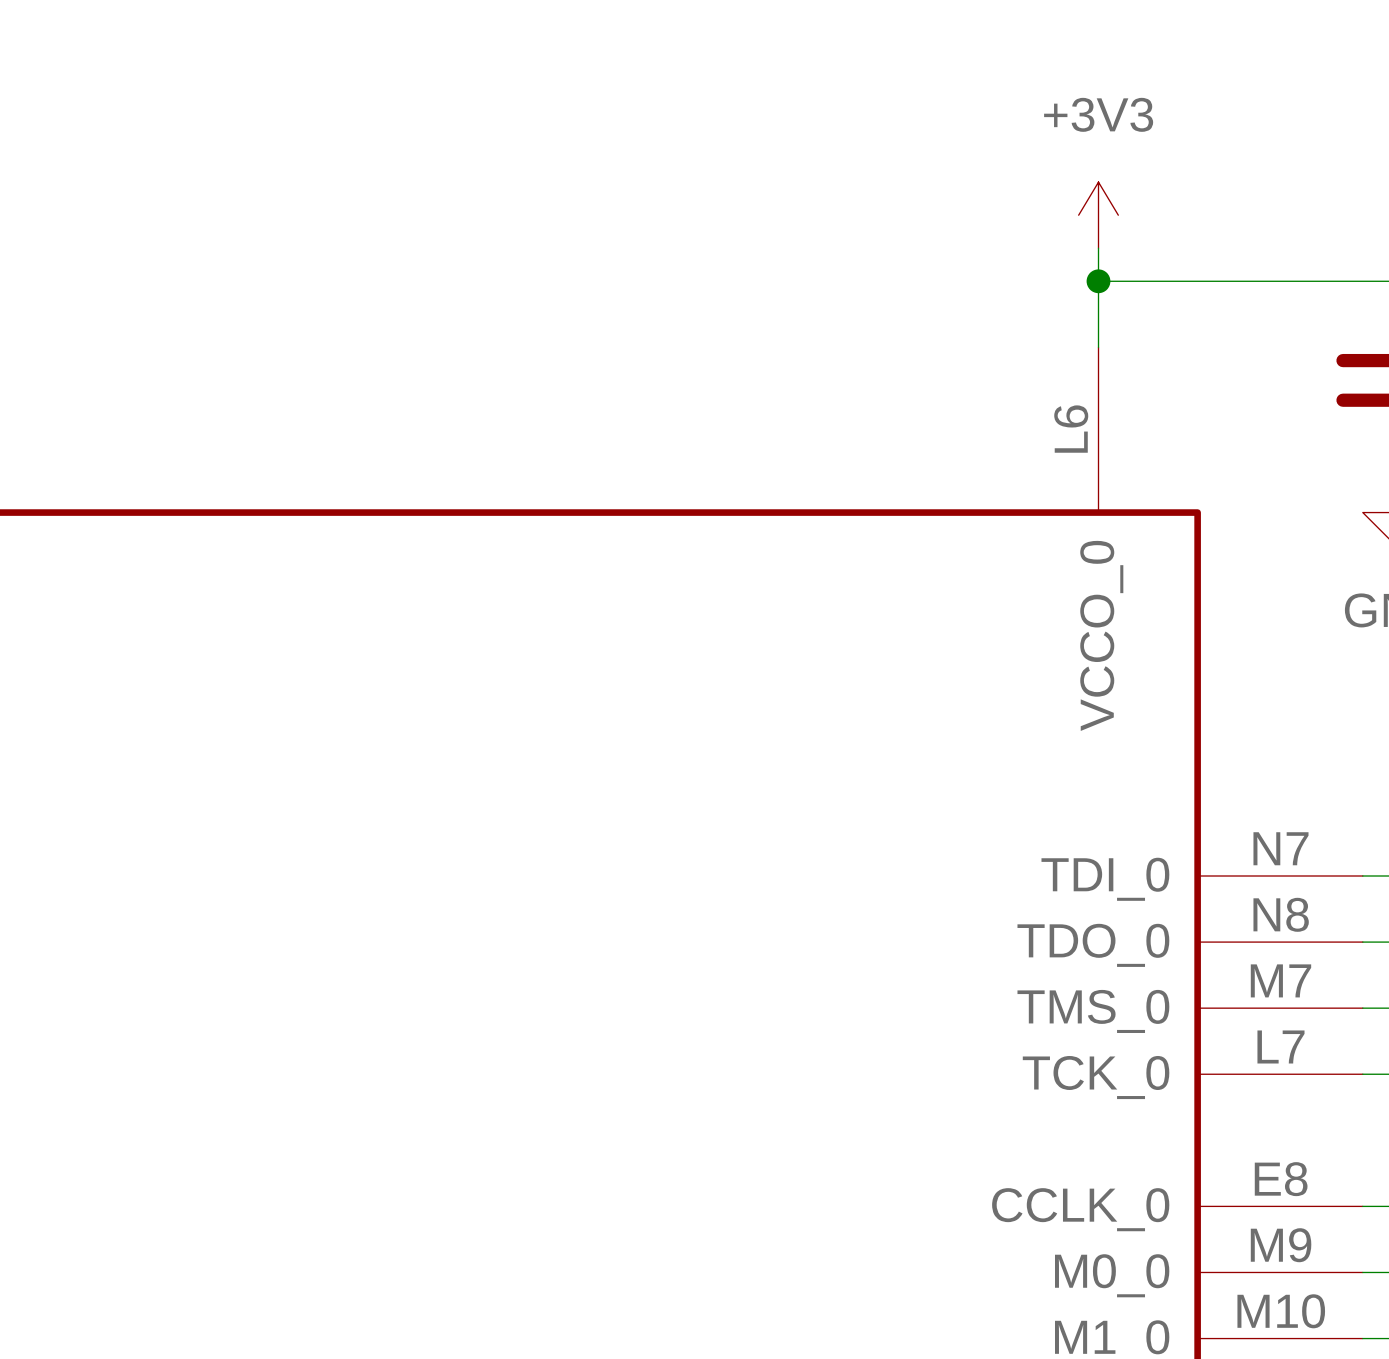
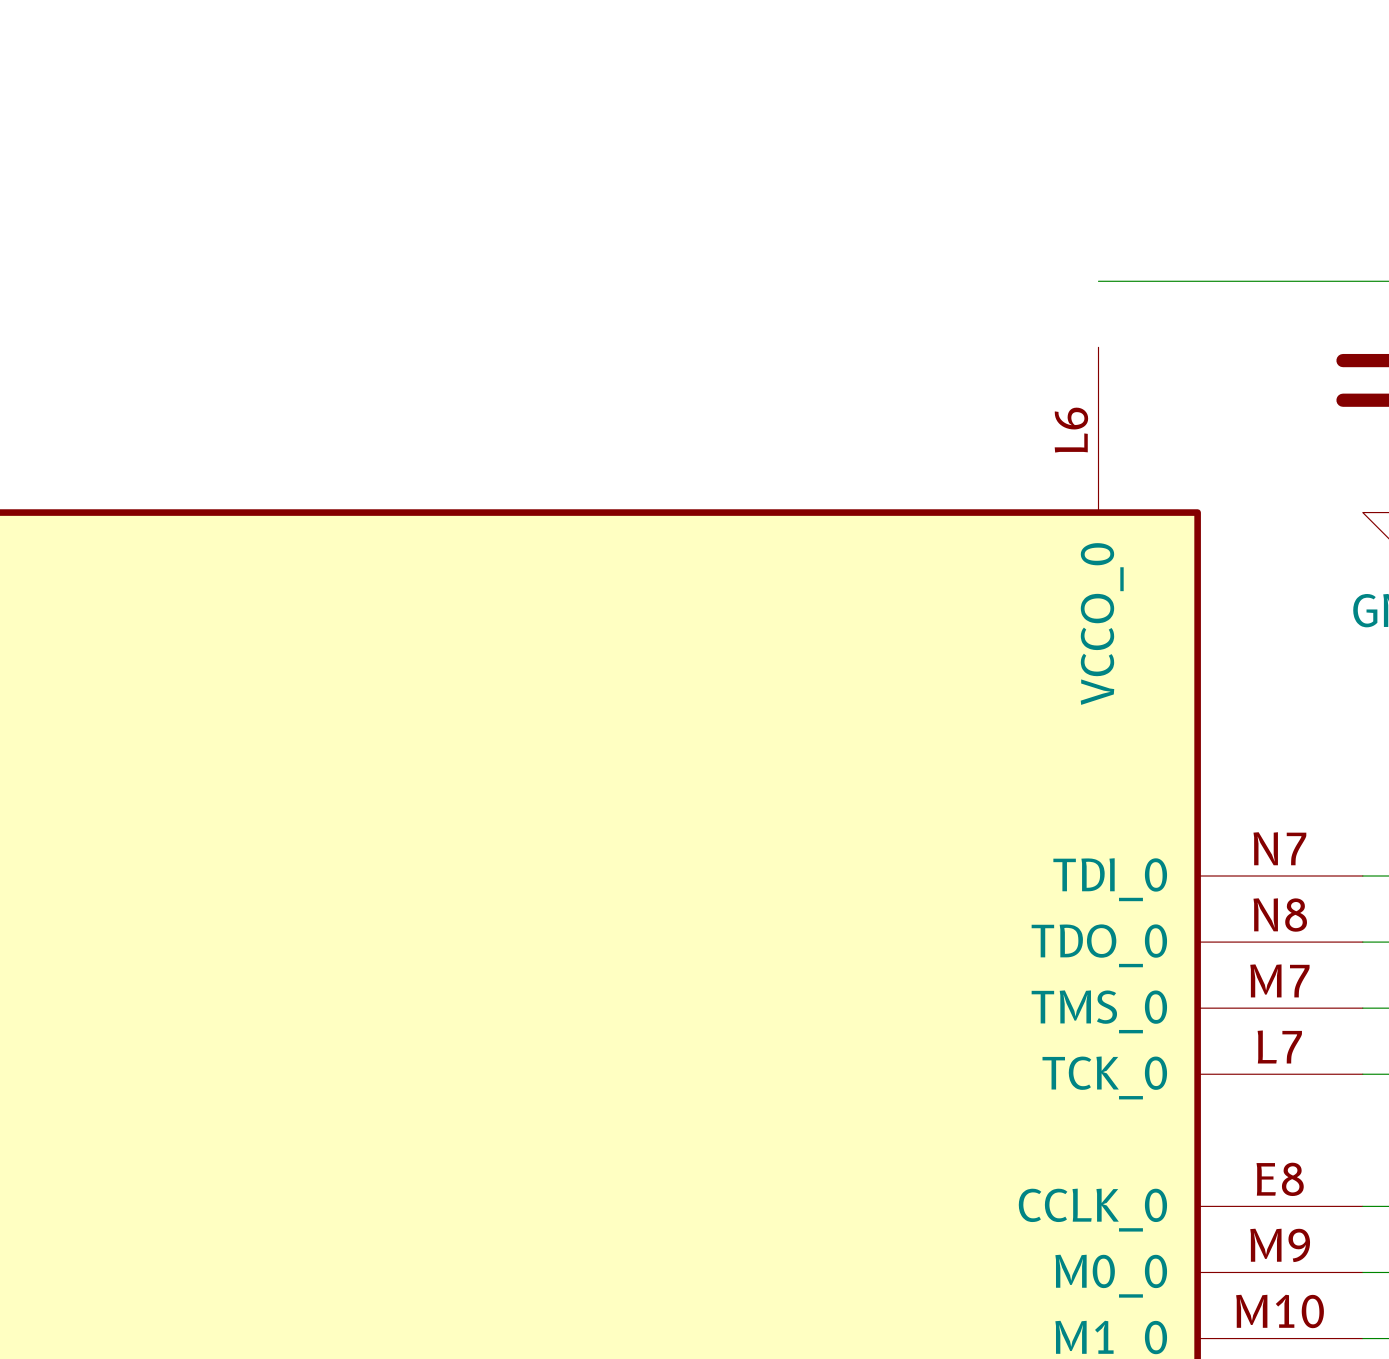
power symbol: +3V3 (1098, 215) -> none
wire: (1098, 248) (1098, 347) -> none
junction: (1098, 281) -> none

